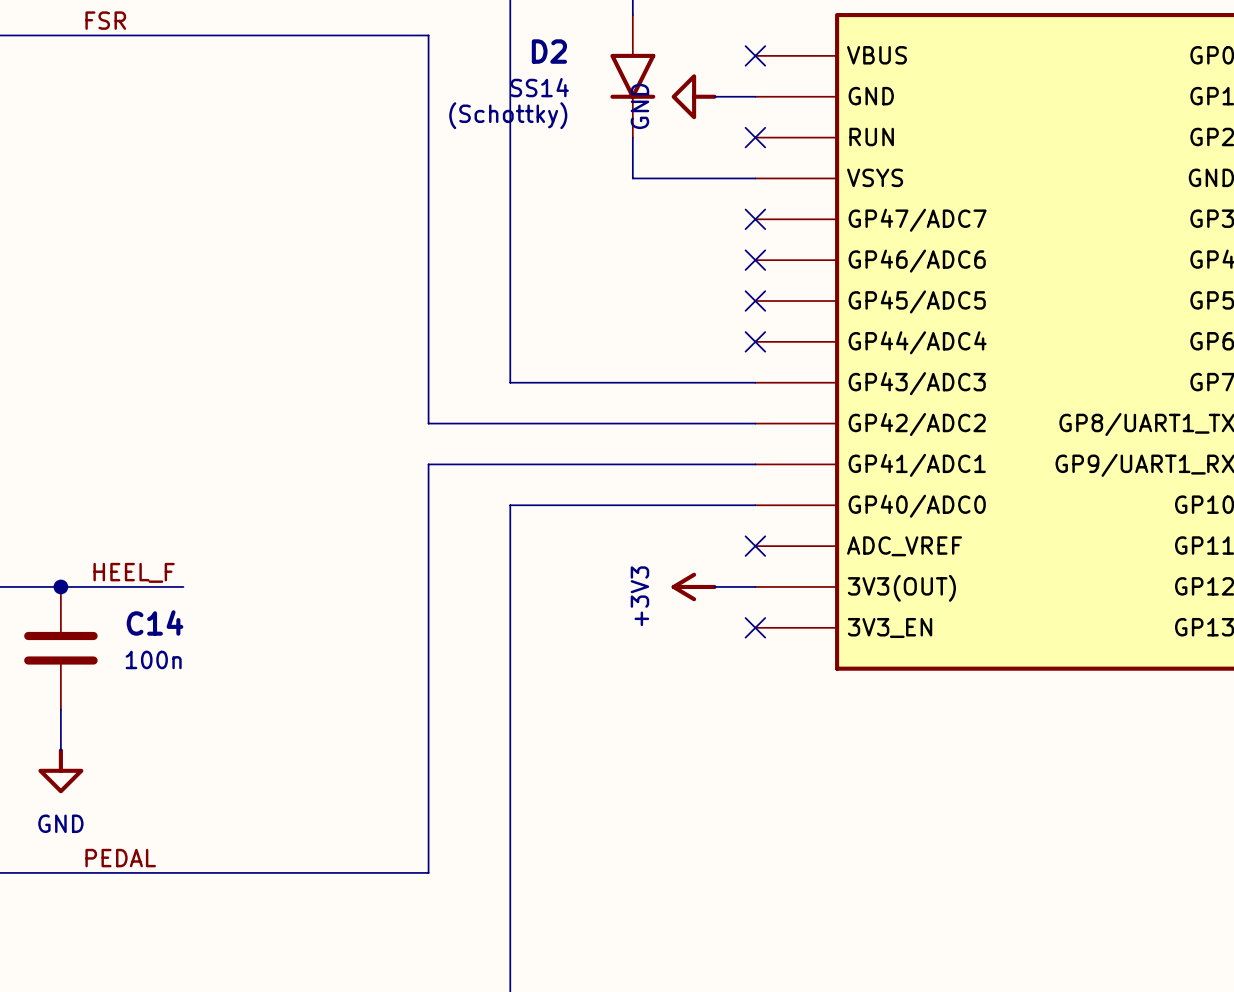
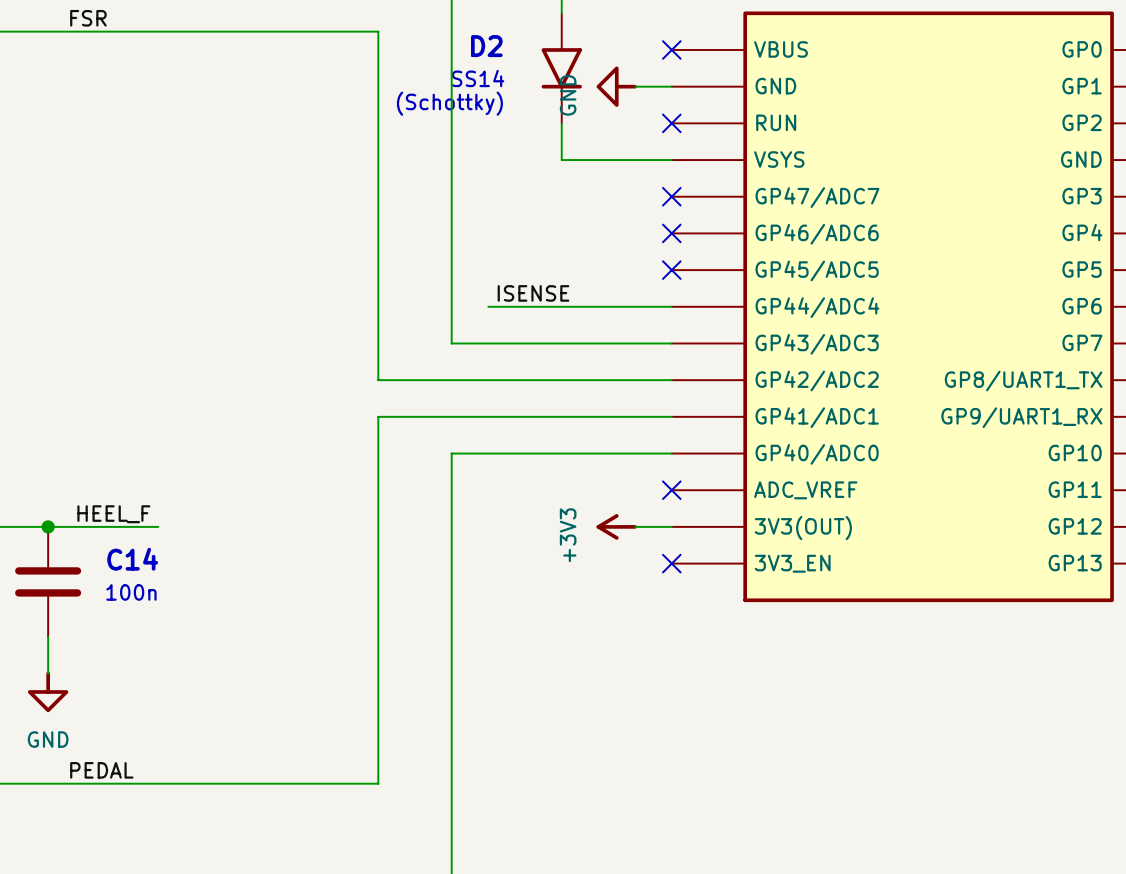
label: none -> ISENSE (533, 293)
wire: none -> (488, 306) (671, 306)
no-connect mark: (755, 341) -> none

